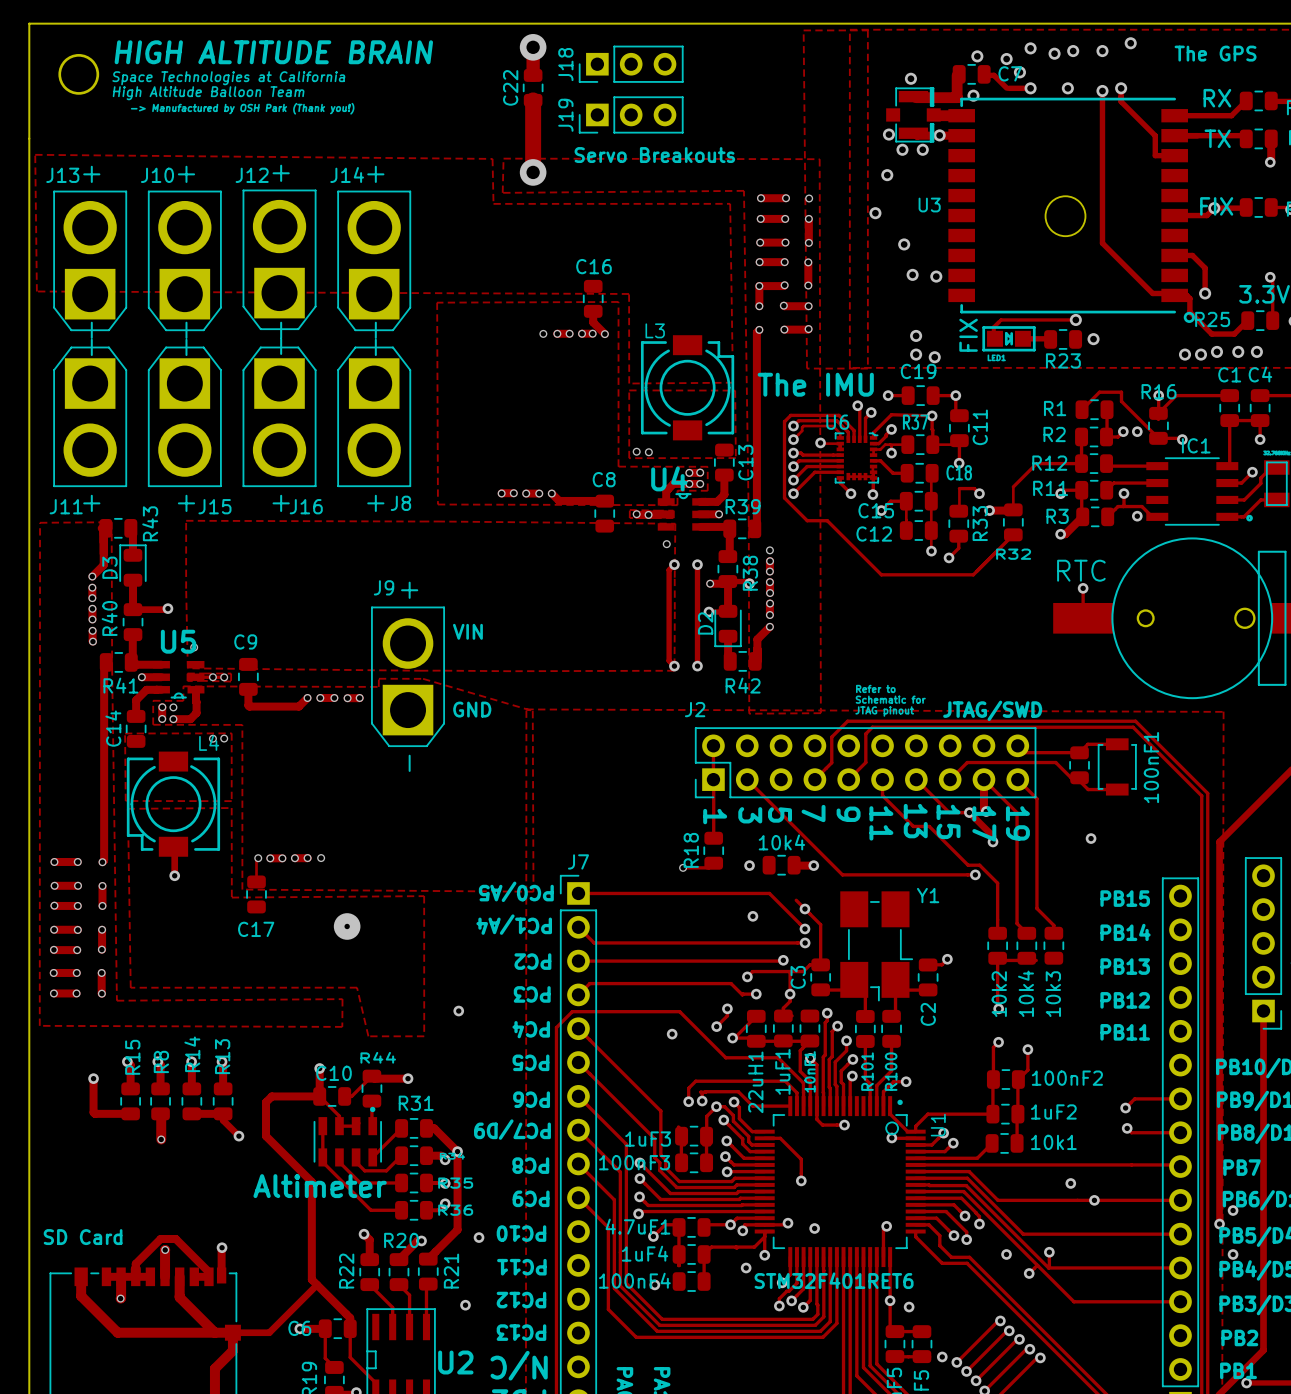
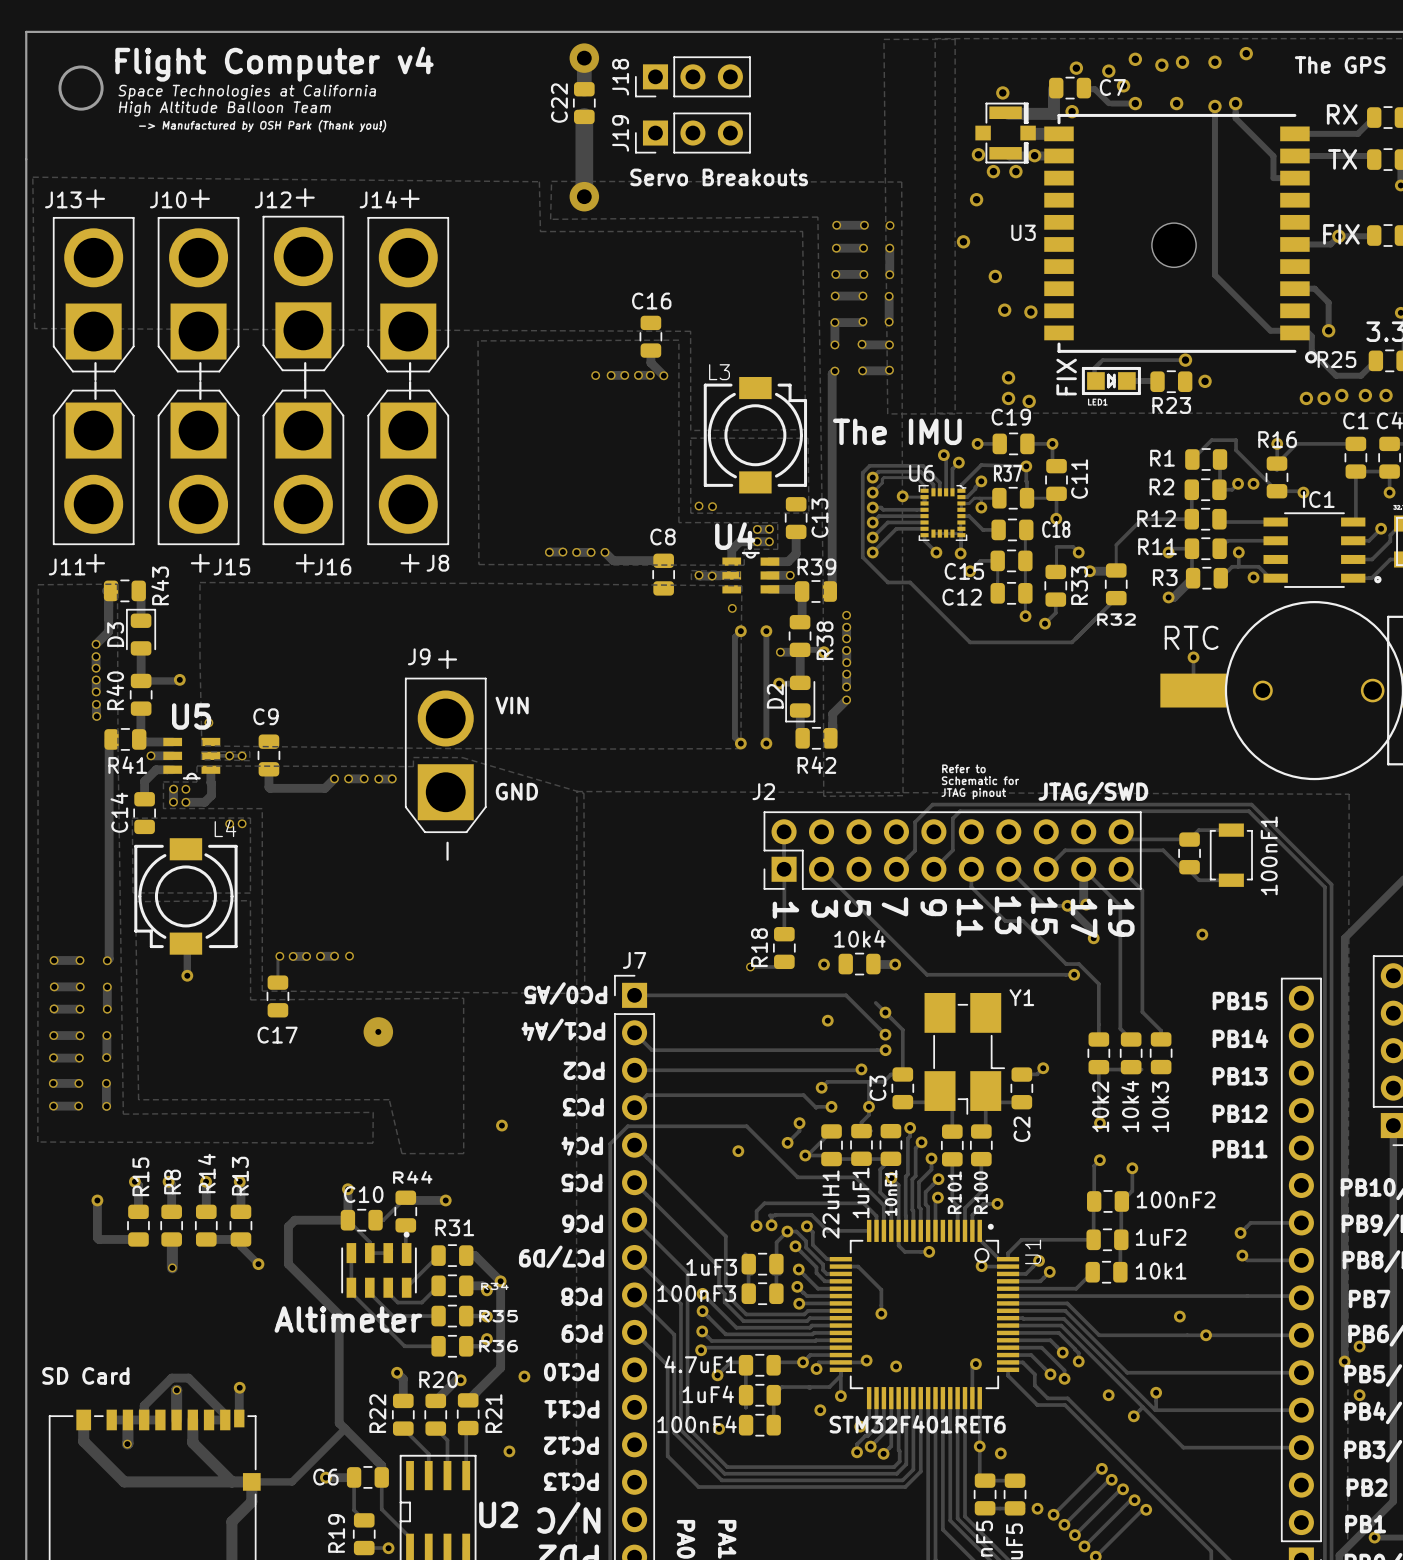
text: none -> Flight Computer v4 (274, 64)
text: HIGH ALTITUDE BRAIN (273, 52) -> none

